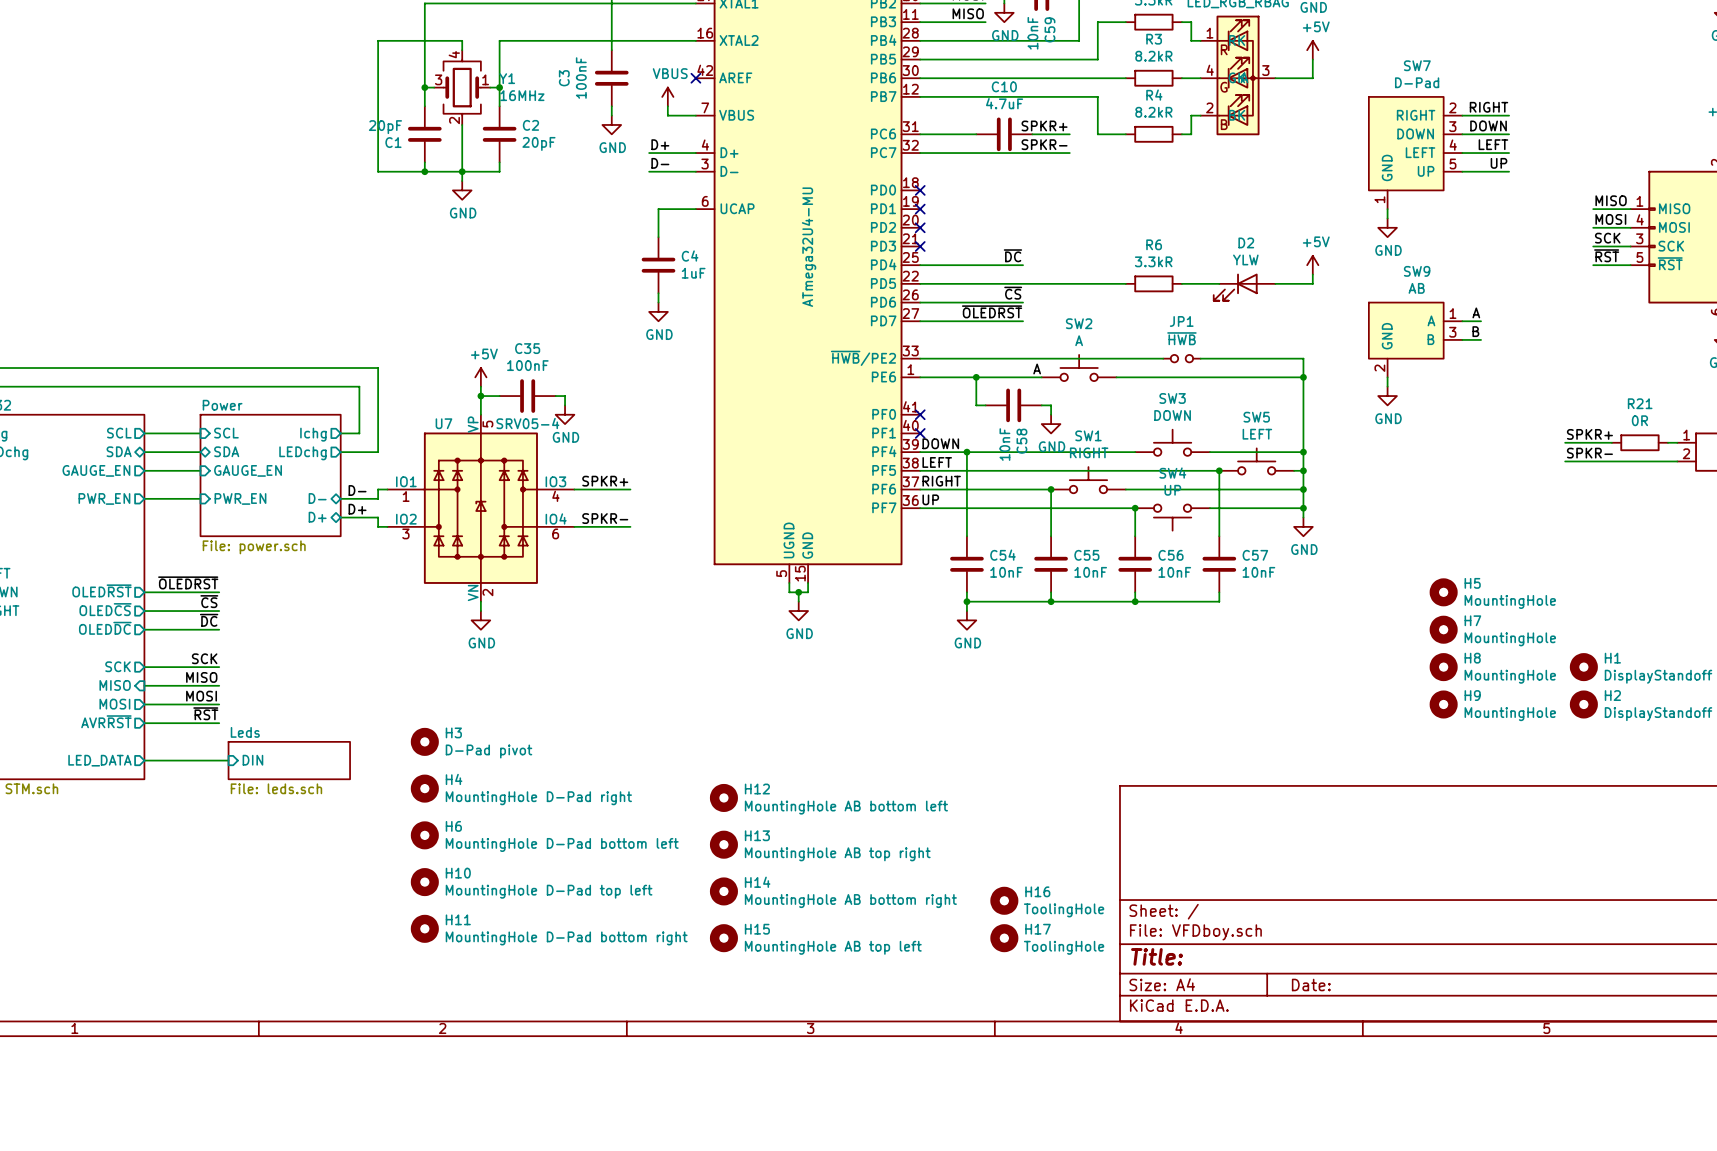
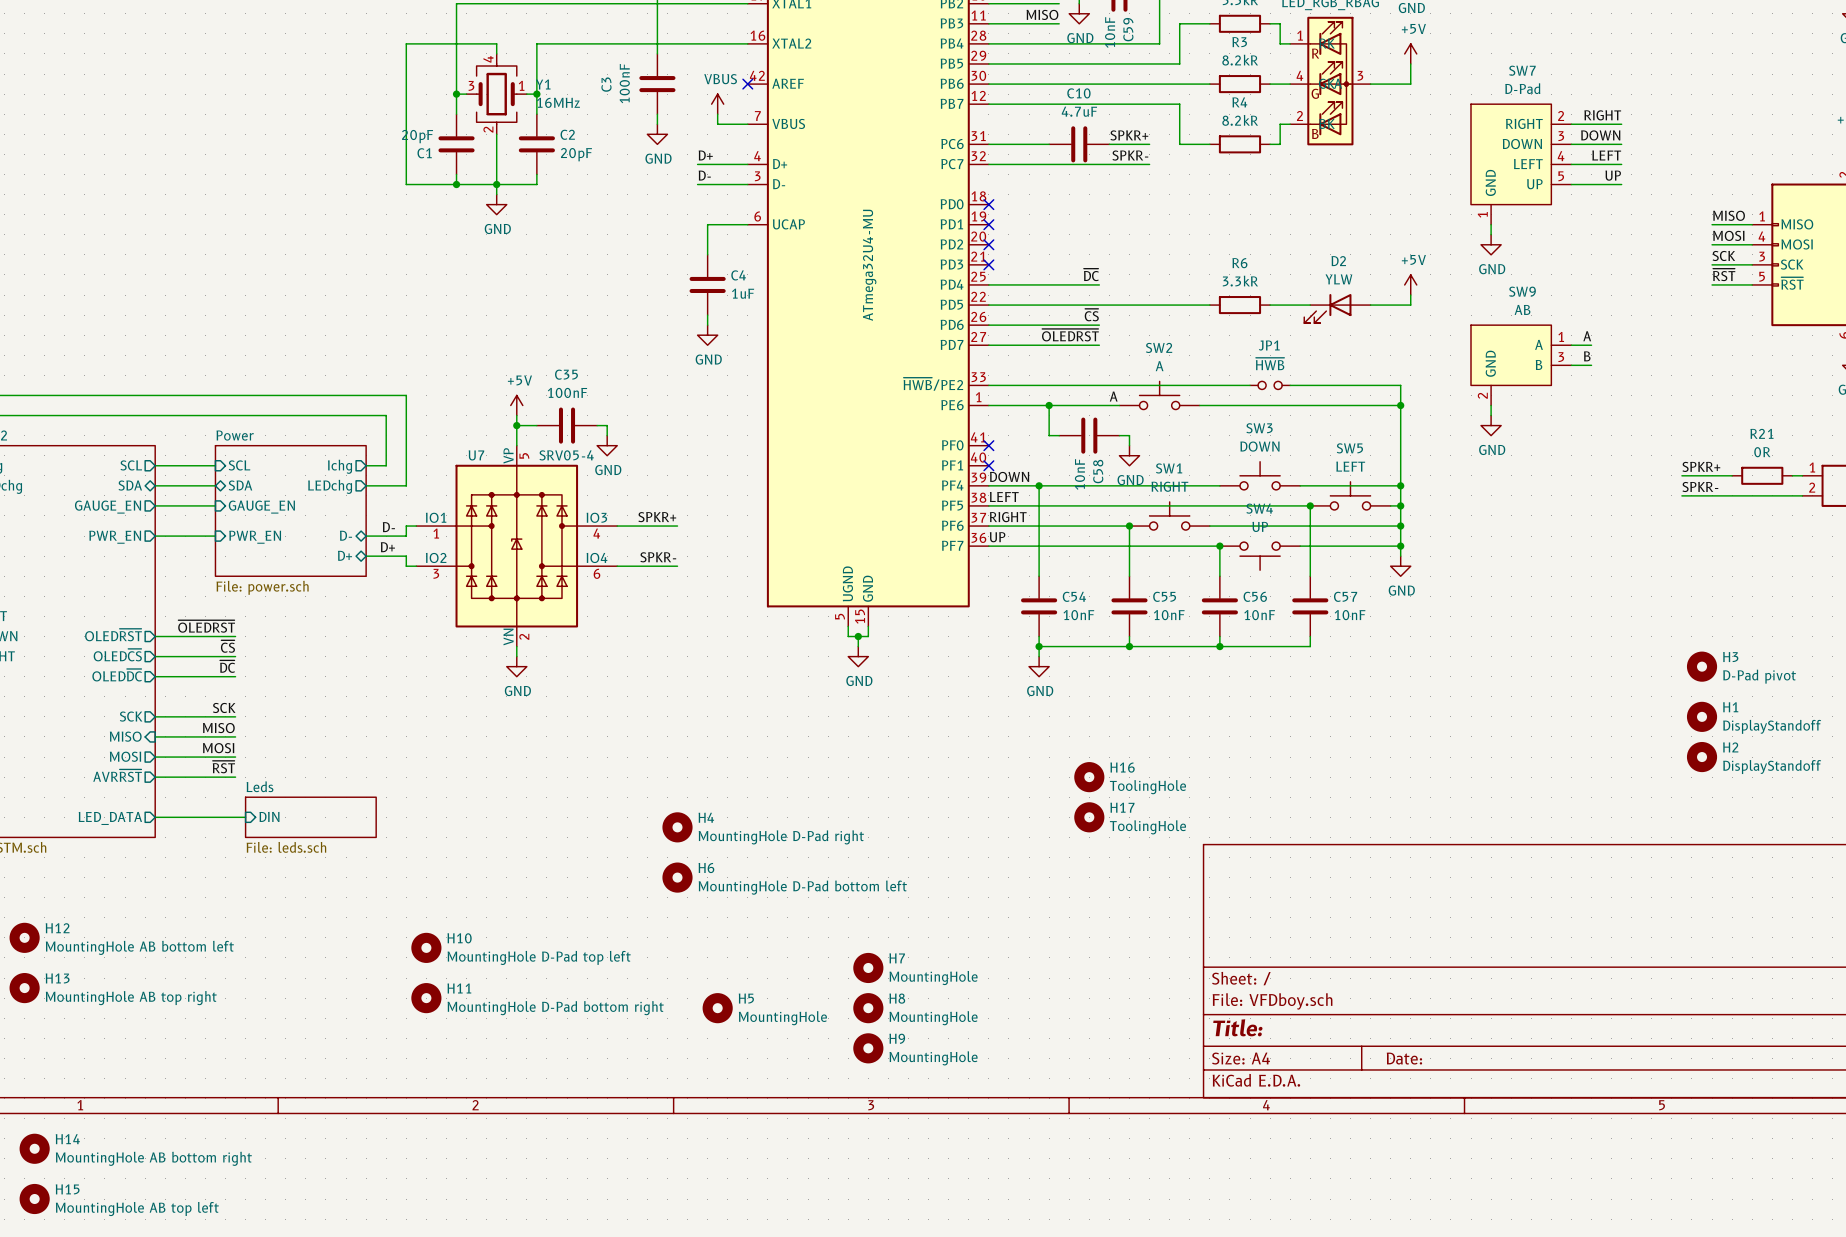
H5 position: (1443, 592) -> (717, 1008)
H7 position: (1443, 629) -> (868, 967)
H8 position: (1443, 667) -> (868, 1008)
H9 position: (1443, 704) -> (868, 1048)
H3 position: (424, 741) -> (1702, 666)
H4 position: (424, 788) -> (677, 827)
H12 position: (723, 797) -> (24, 937)
H6 position: (424, 835) -> (677, 877)
H13 position: (723, 844) -> (24, 988)
H10 position: (424, 882) -> (426, 947)
H14 position: (723, 891) -> (34, 1148)
H16 position: (1004, 900) -> (1089, 777)
H11 position: (424, 928) -> (426, 998)
H15 position: (723, 938) -> (34, 1199)
H17 position: (1004, 938) -> (1089, 817)

